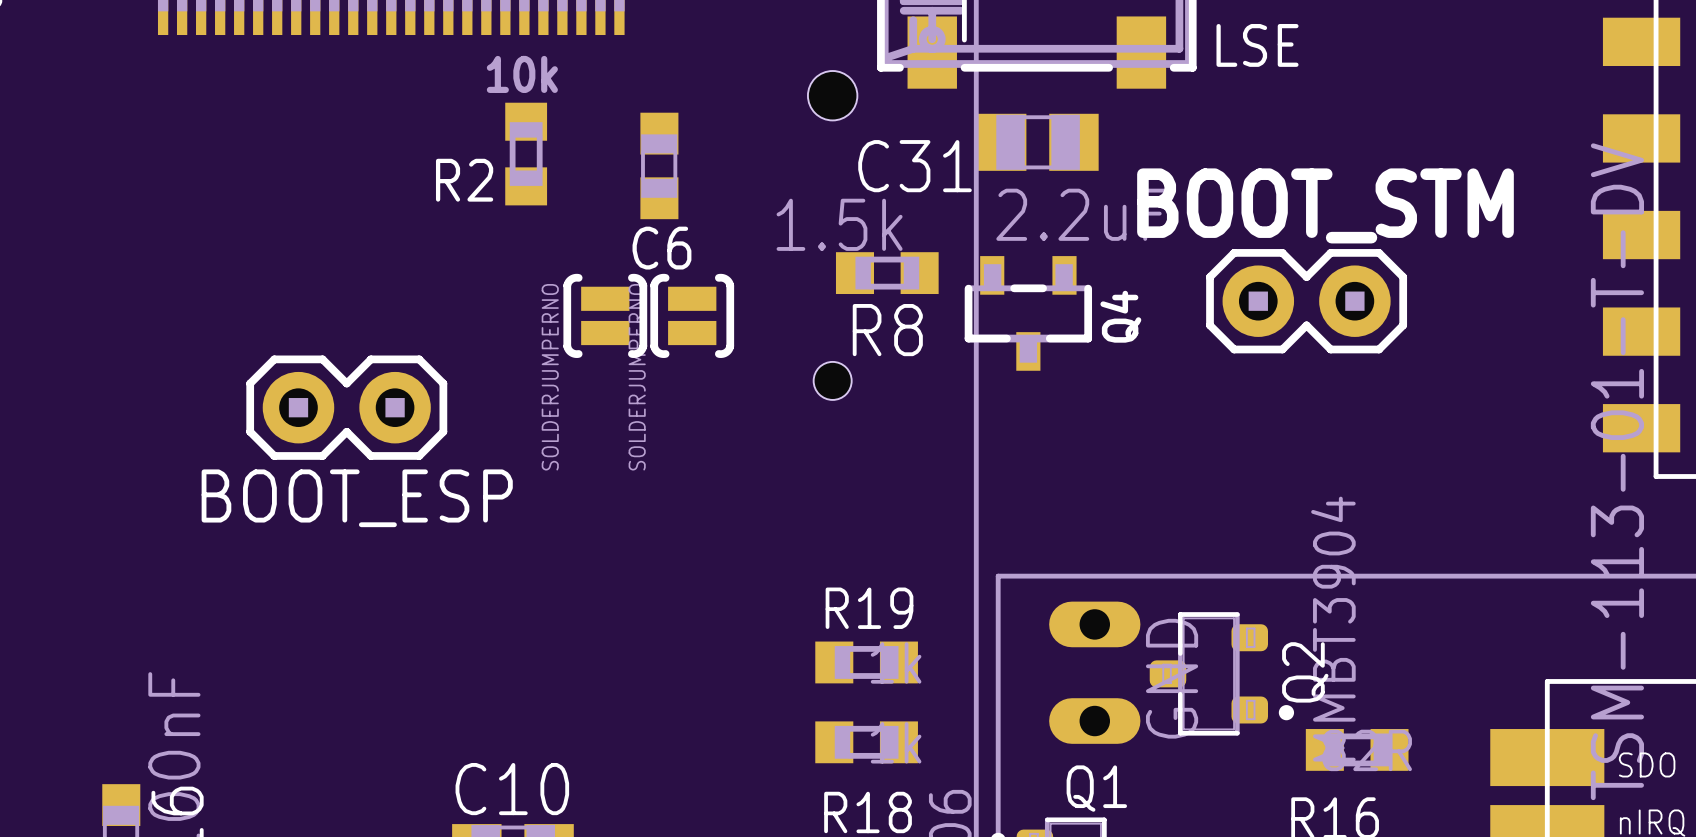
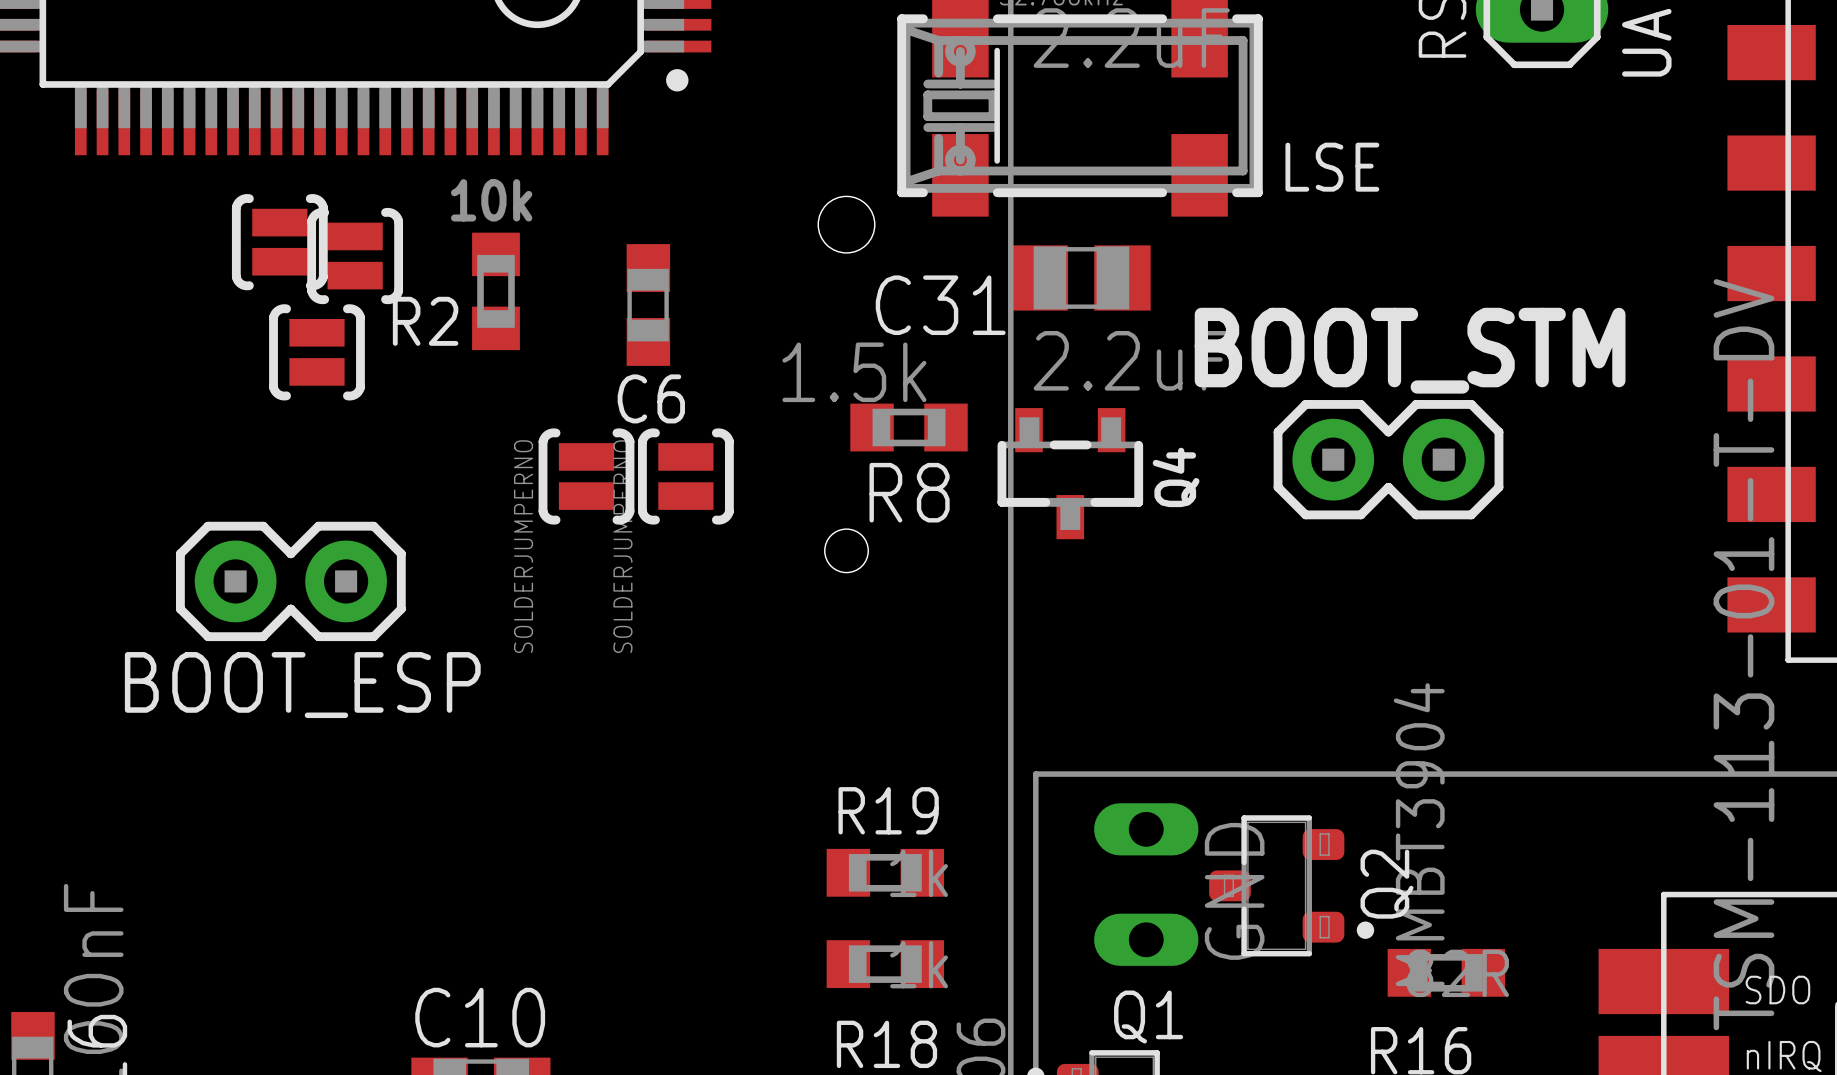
part: none -> (279, 242)
part: none -> (355, 256)
part: none -> (316, 352)

